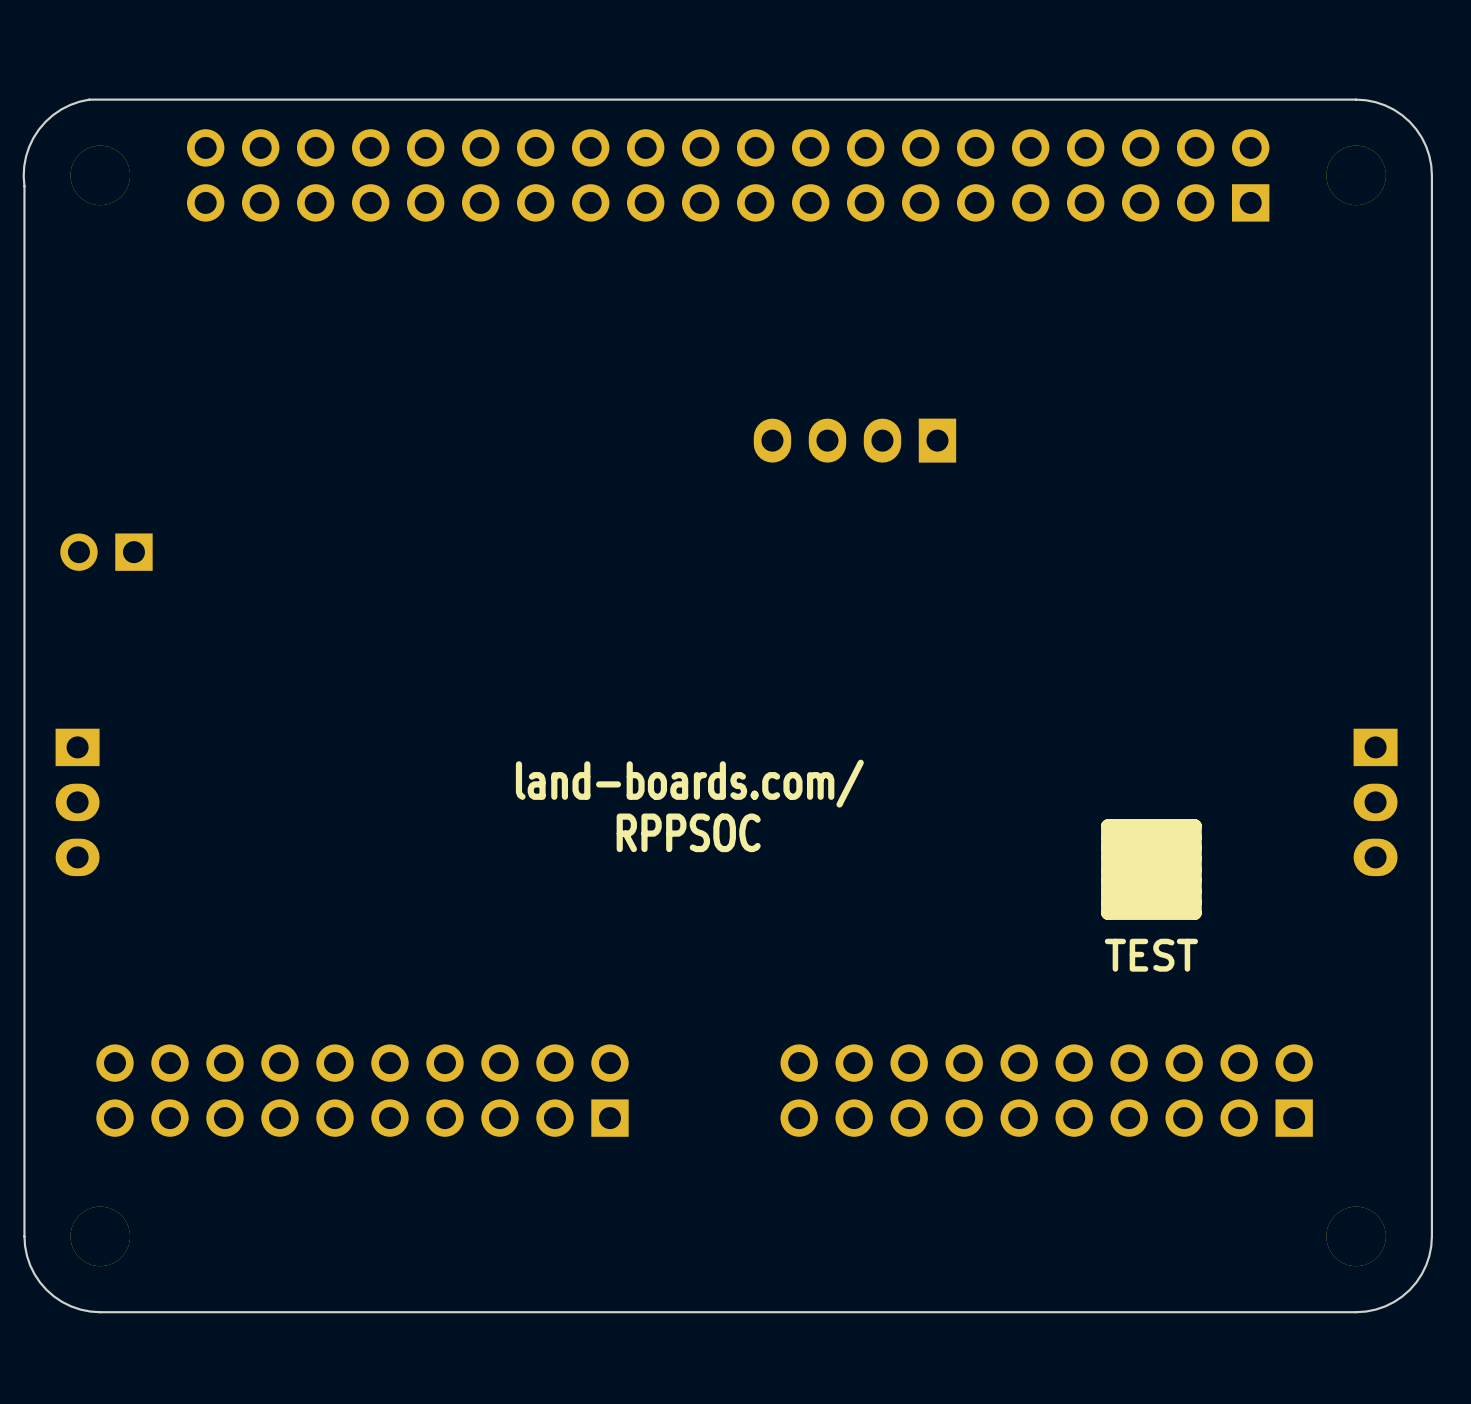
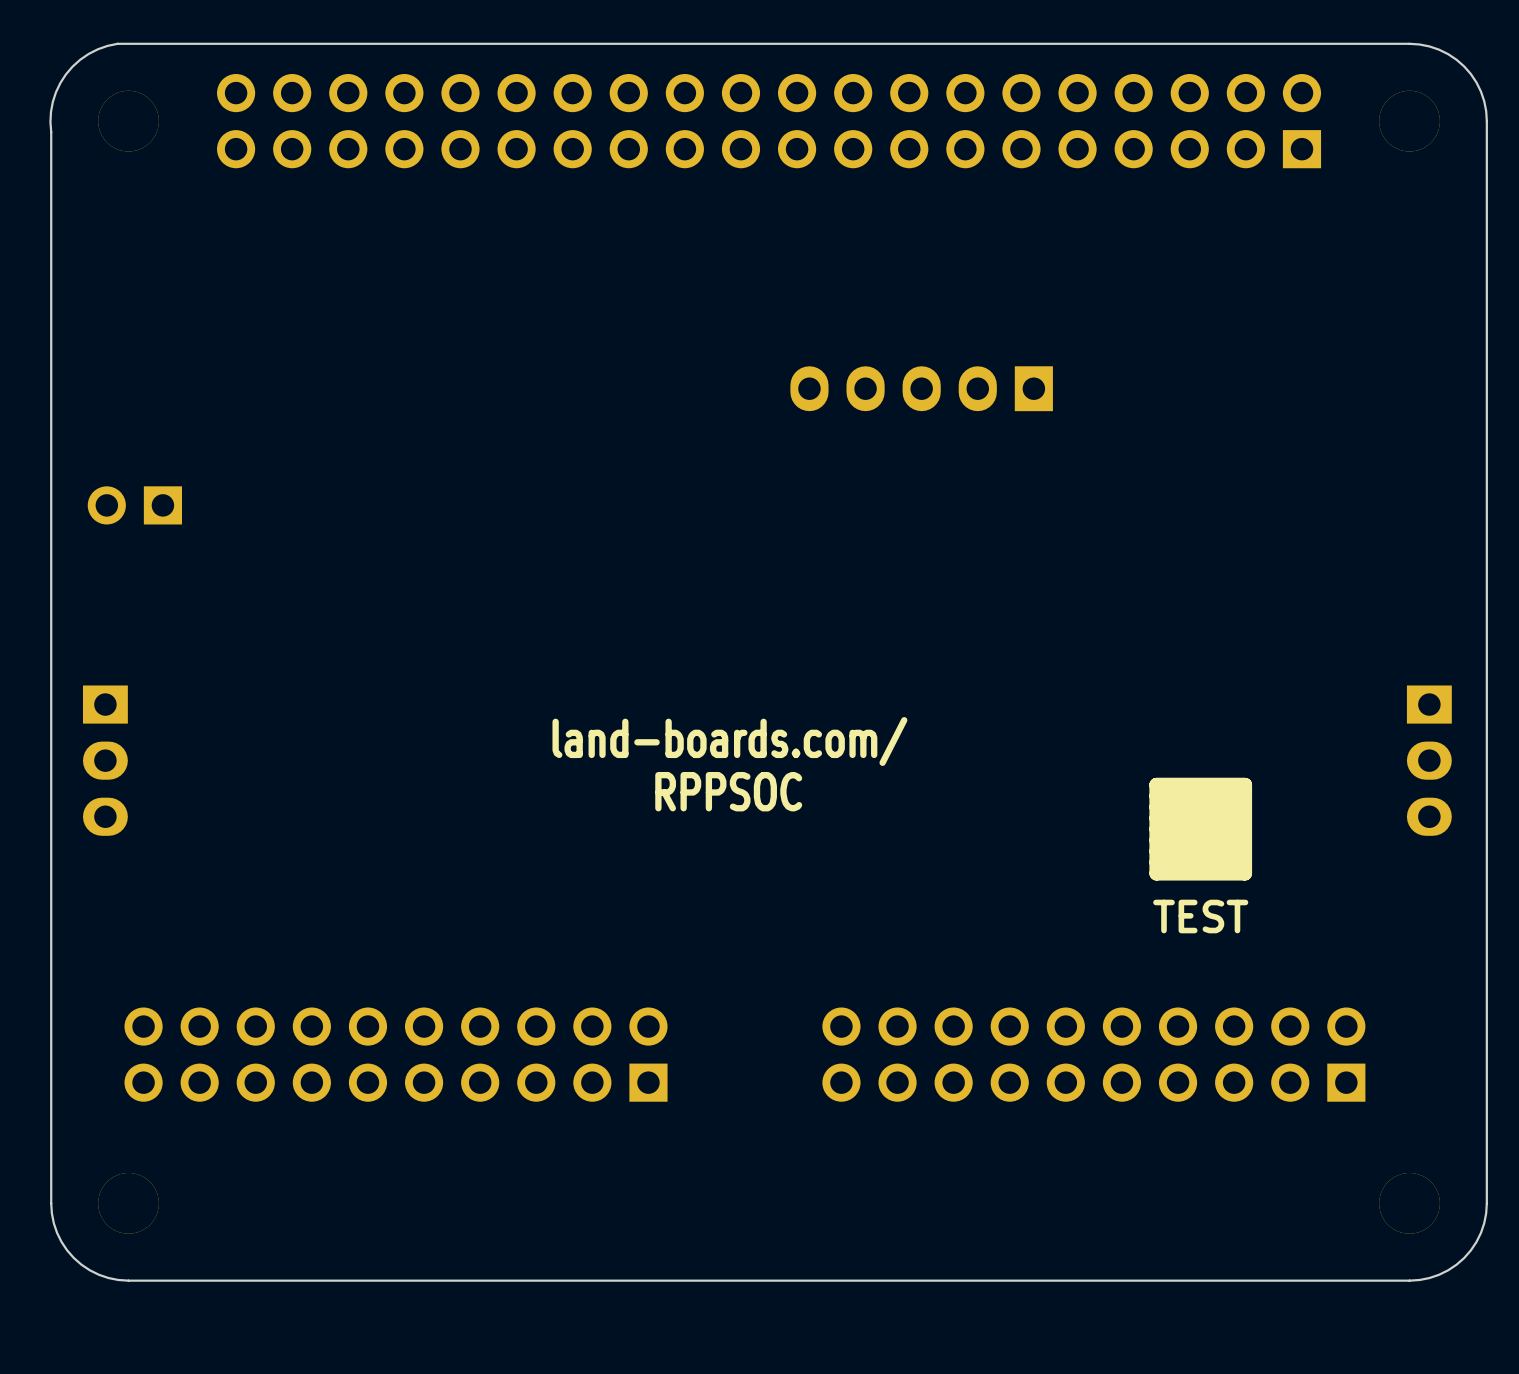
part: none -> (921, 388)
part: (854, 440) -> none

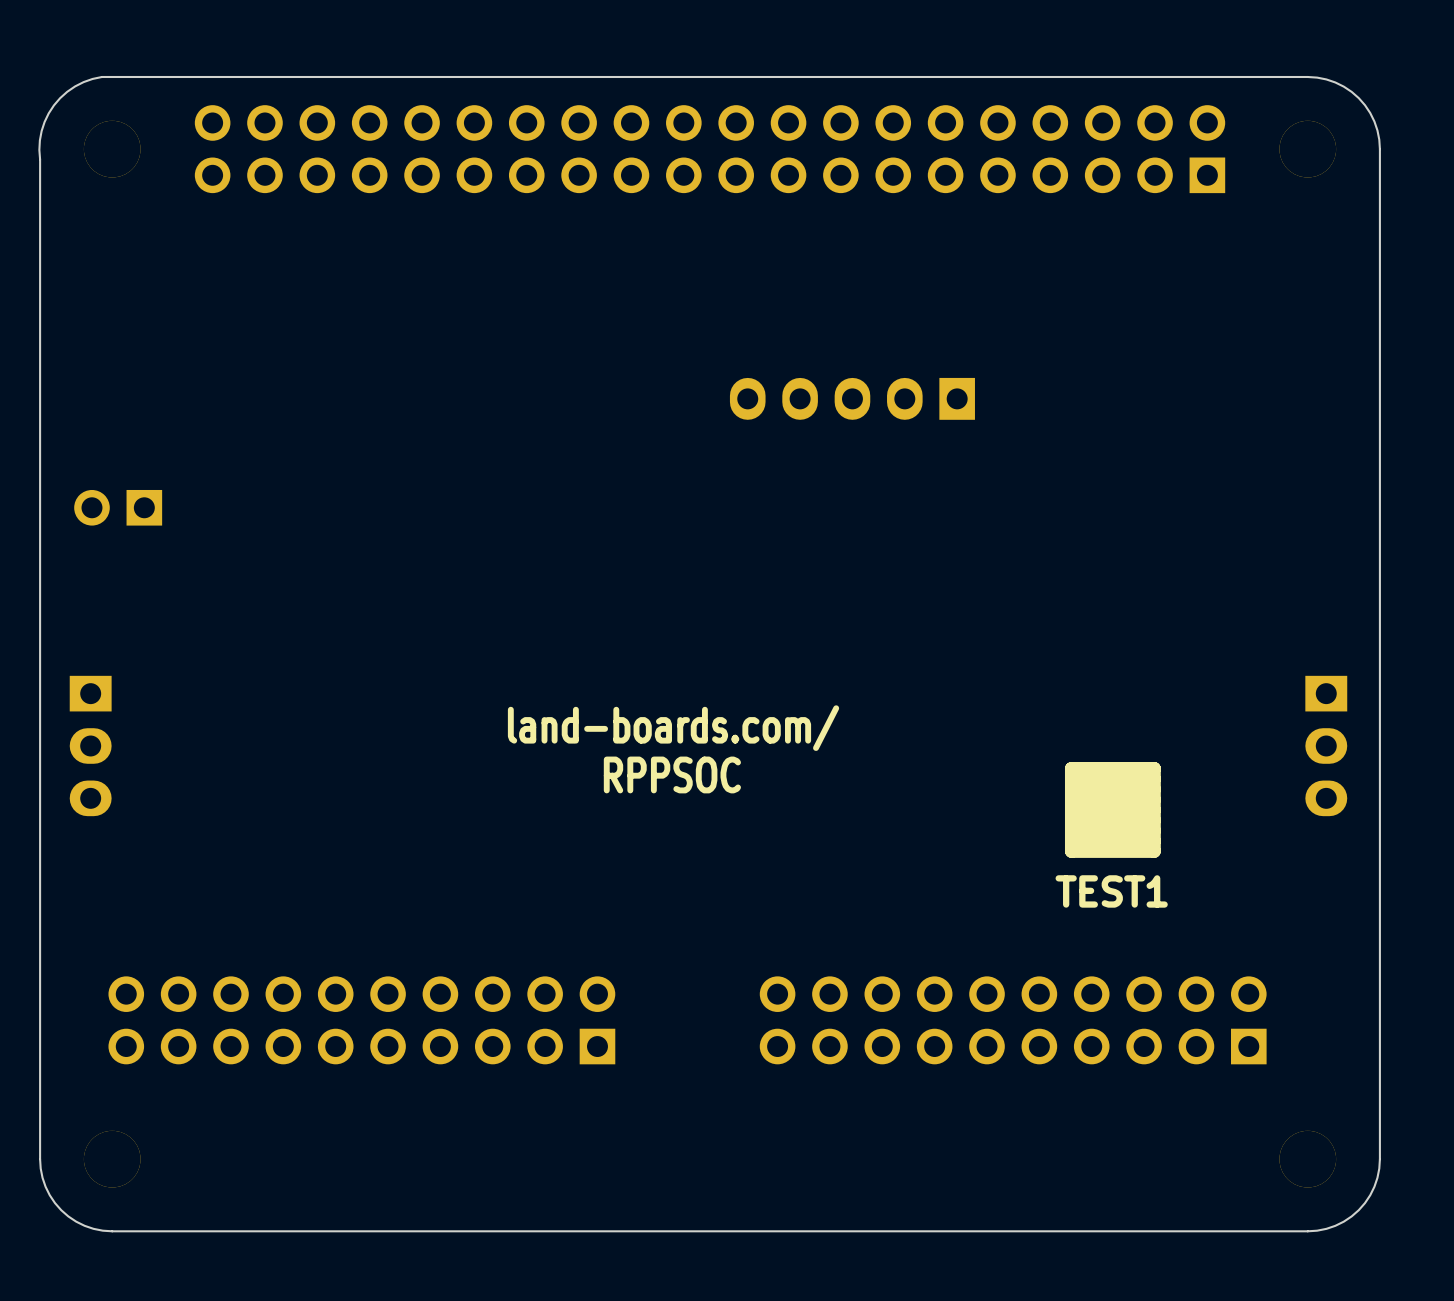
TEST name: TEST (1200, 916) -> TEST1 (1111, 891)

